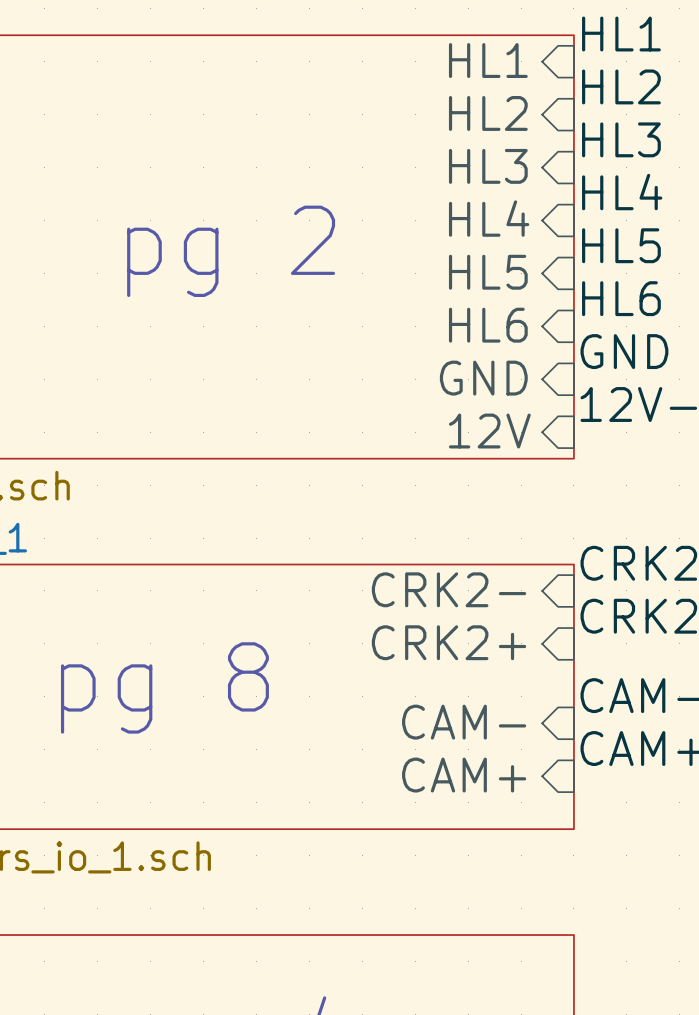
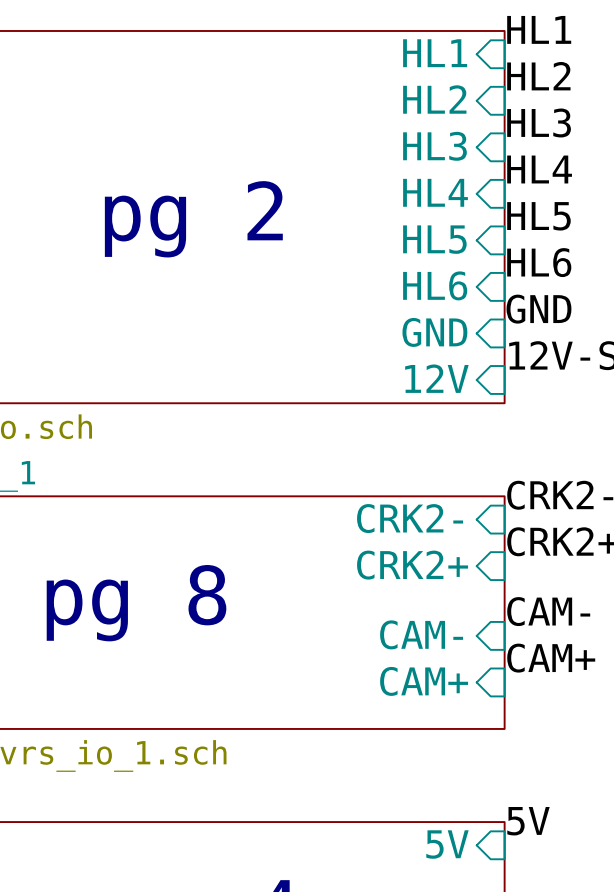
label: none -> 5V (528, 821)
sheet pin: none -> 5V (447, 844)

